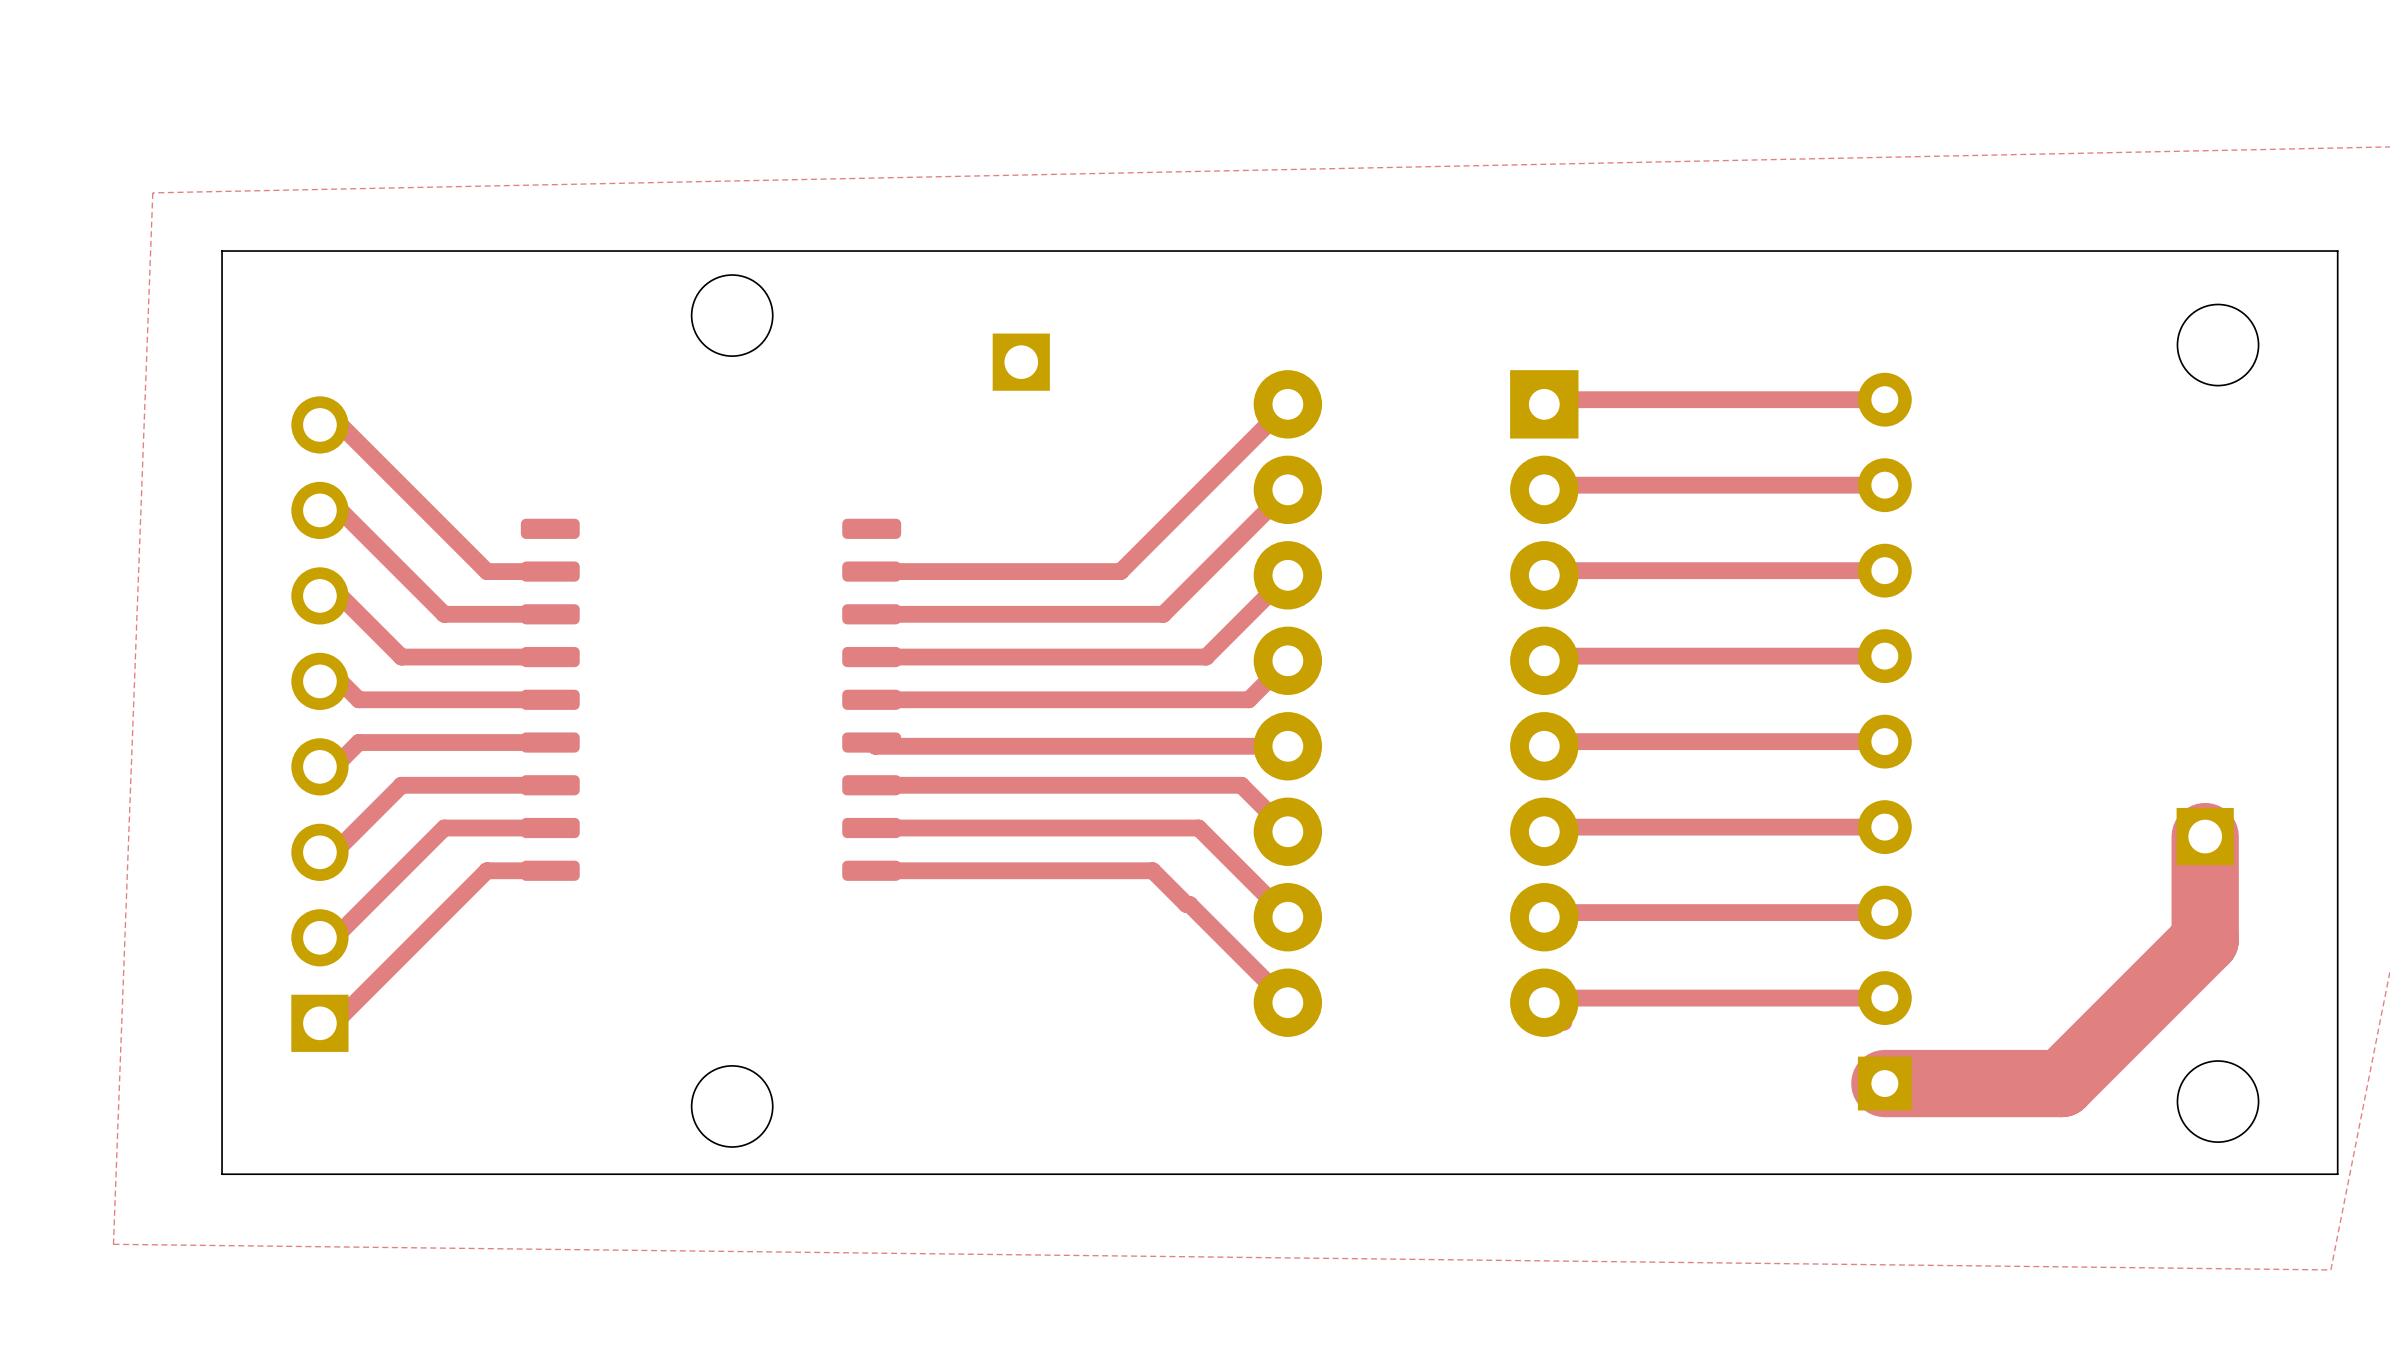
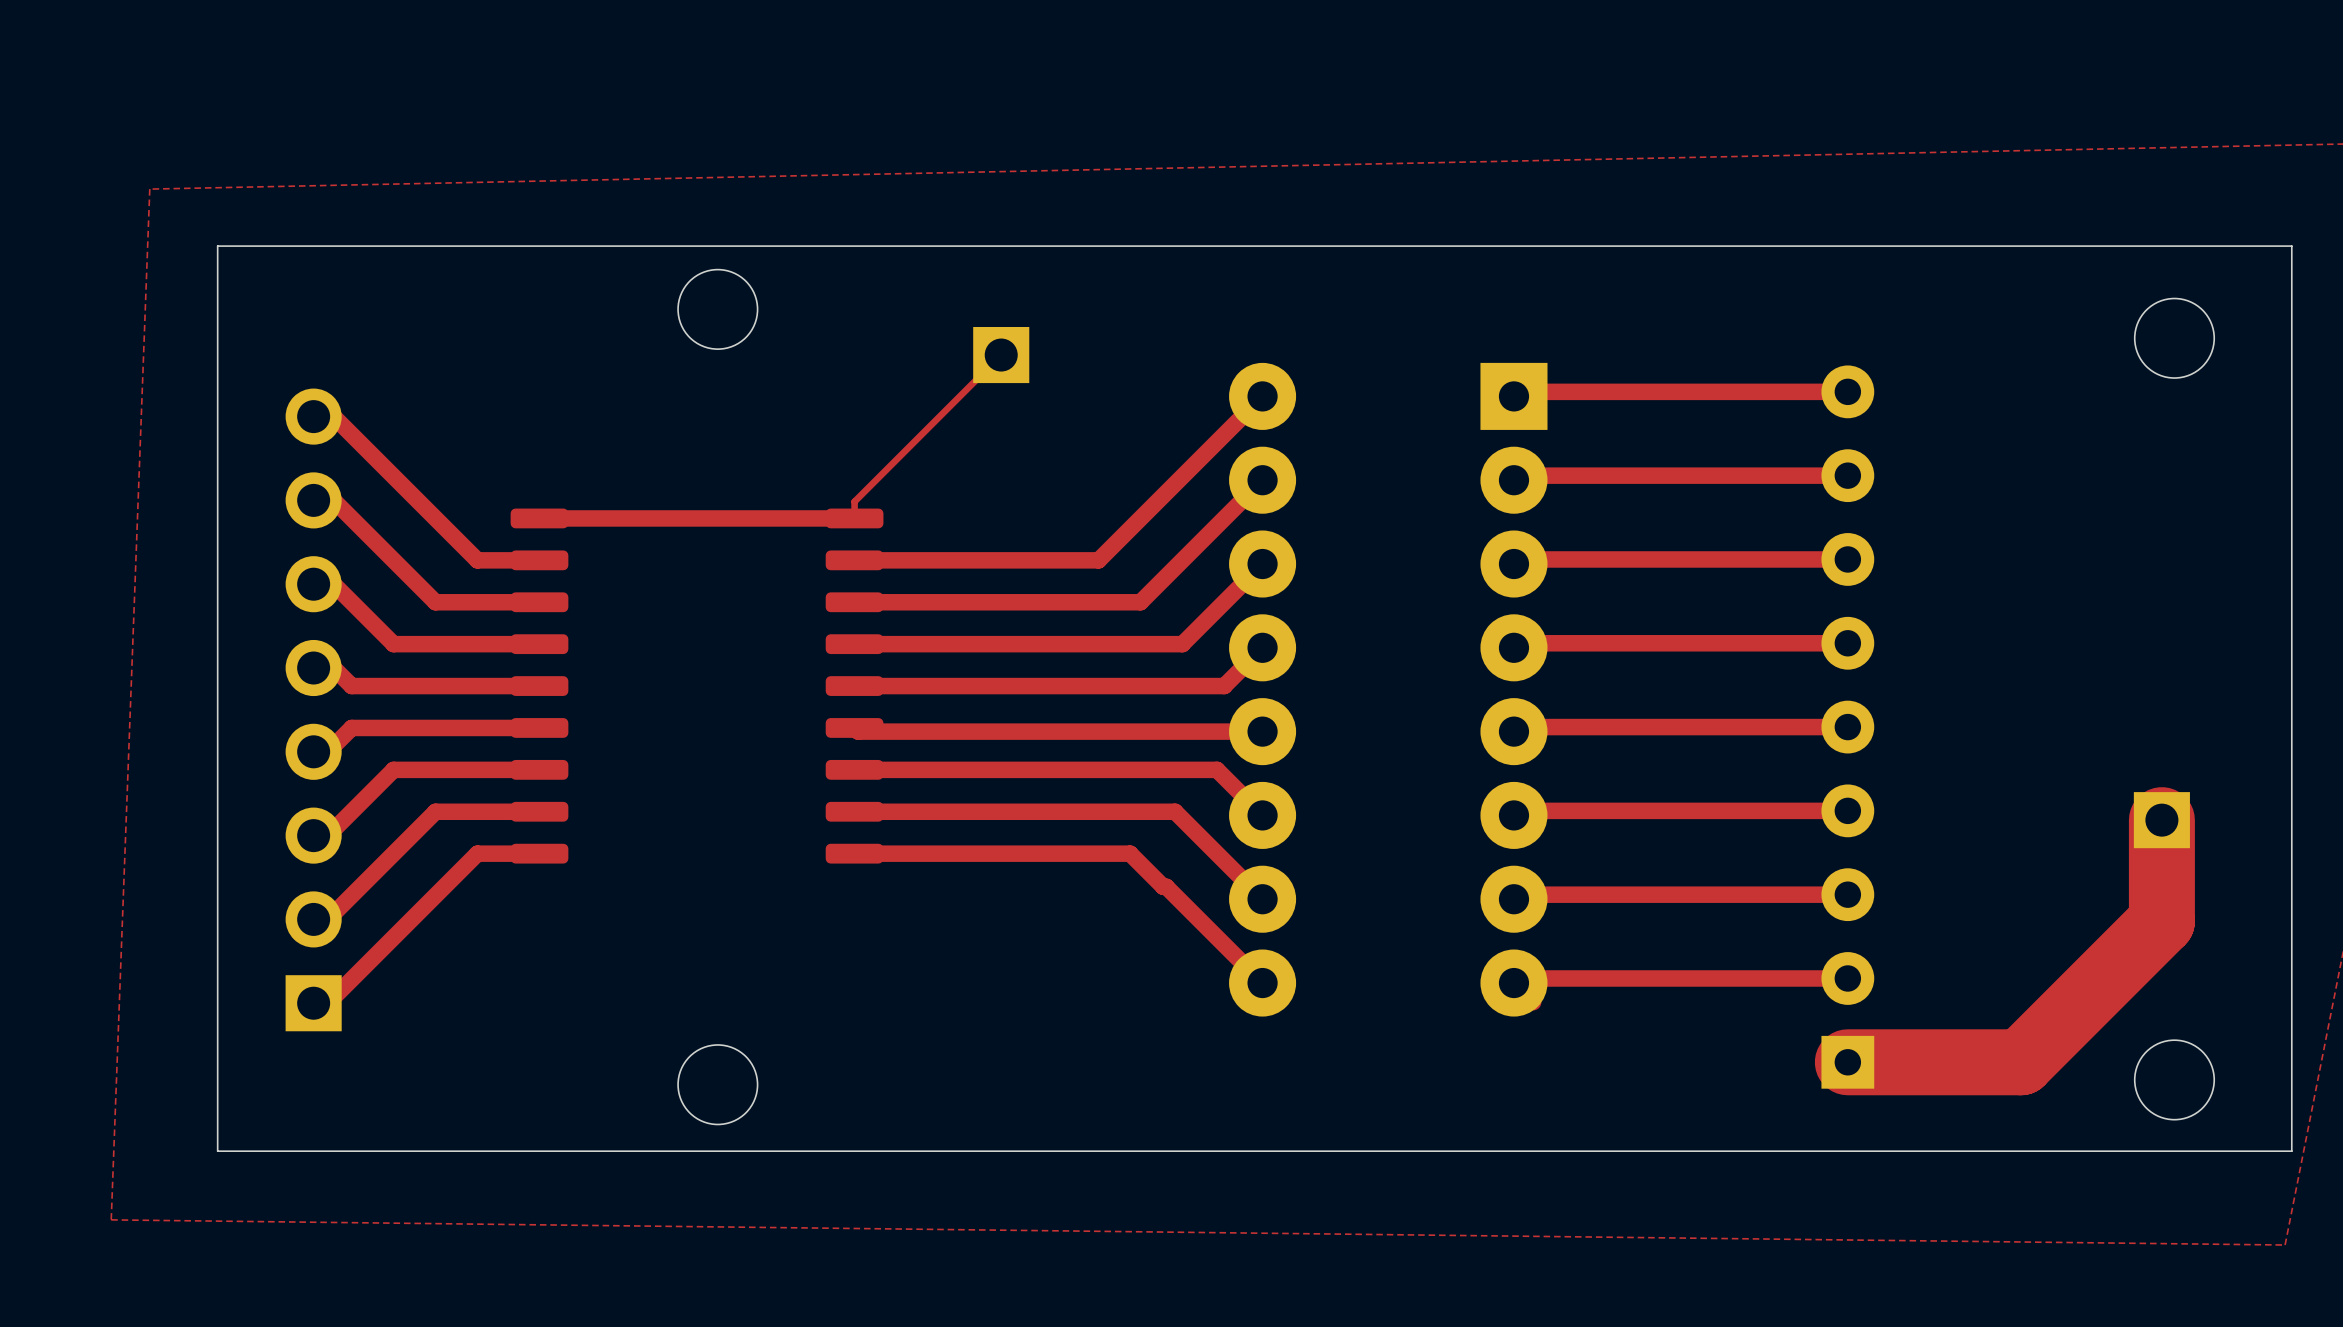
top track: none -> (1001, 355) (854, 501) (854, 518) (539, 518)

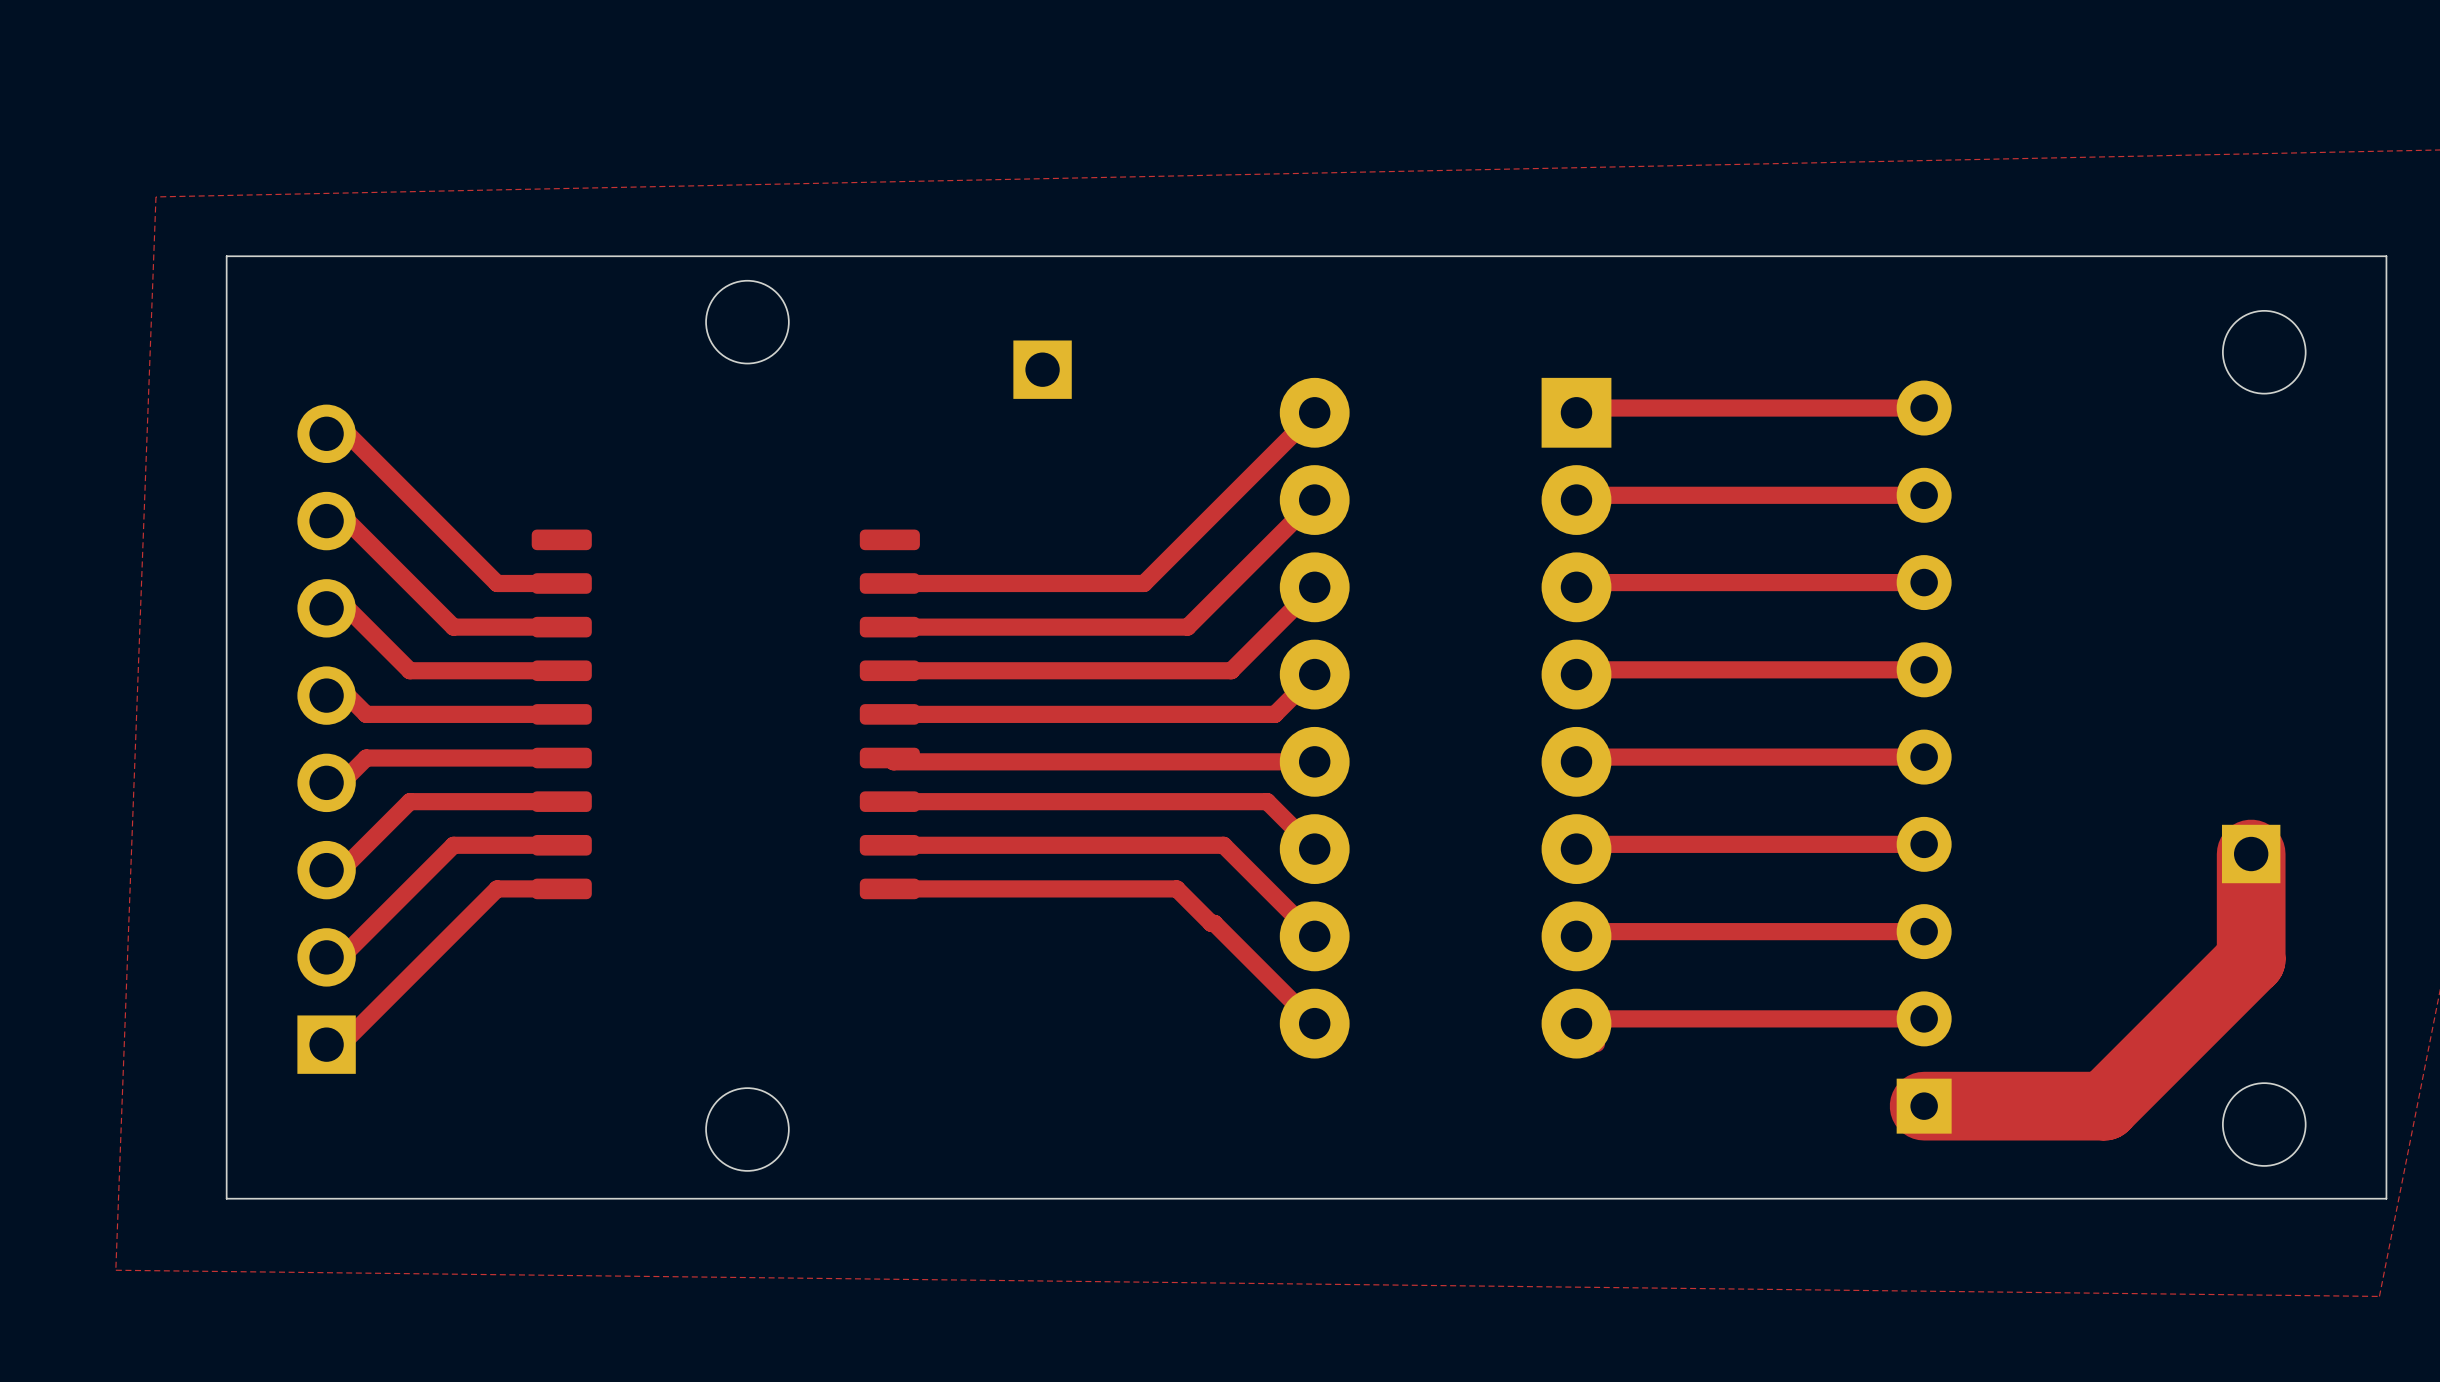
top track: (1001, 355) (854, 501) (854, 518) (539, 518) -> none

